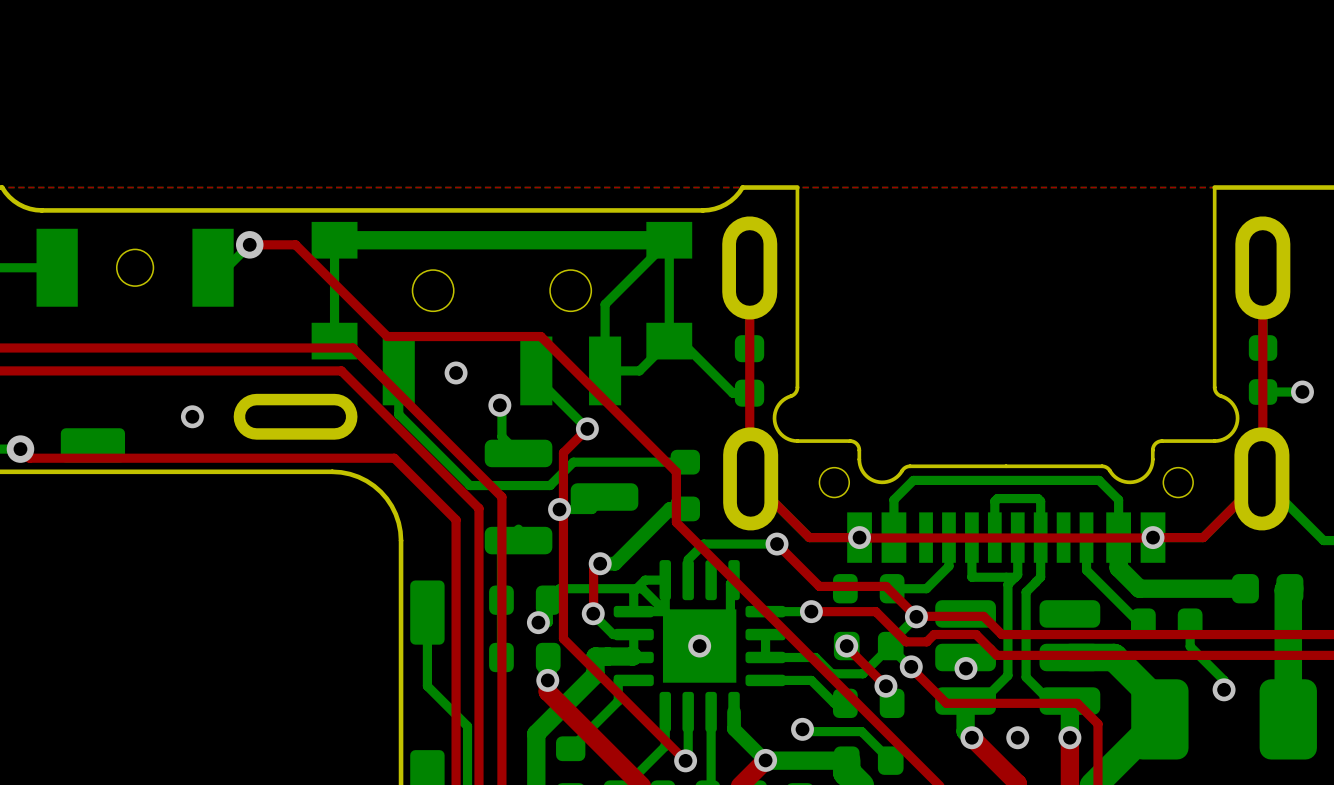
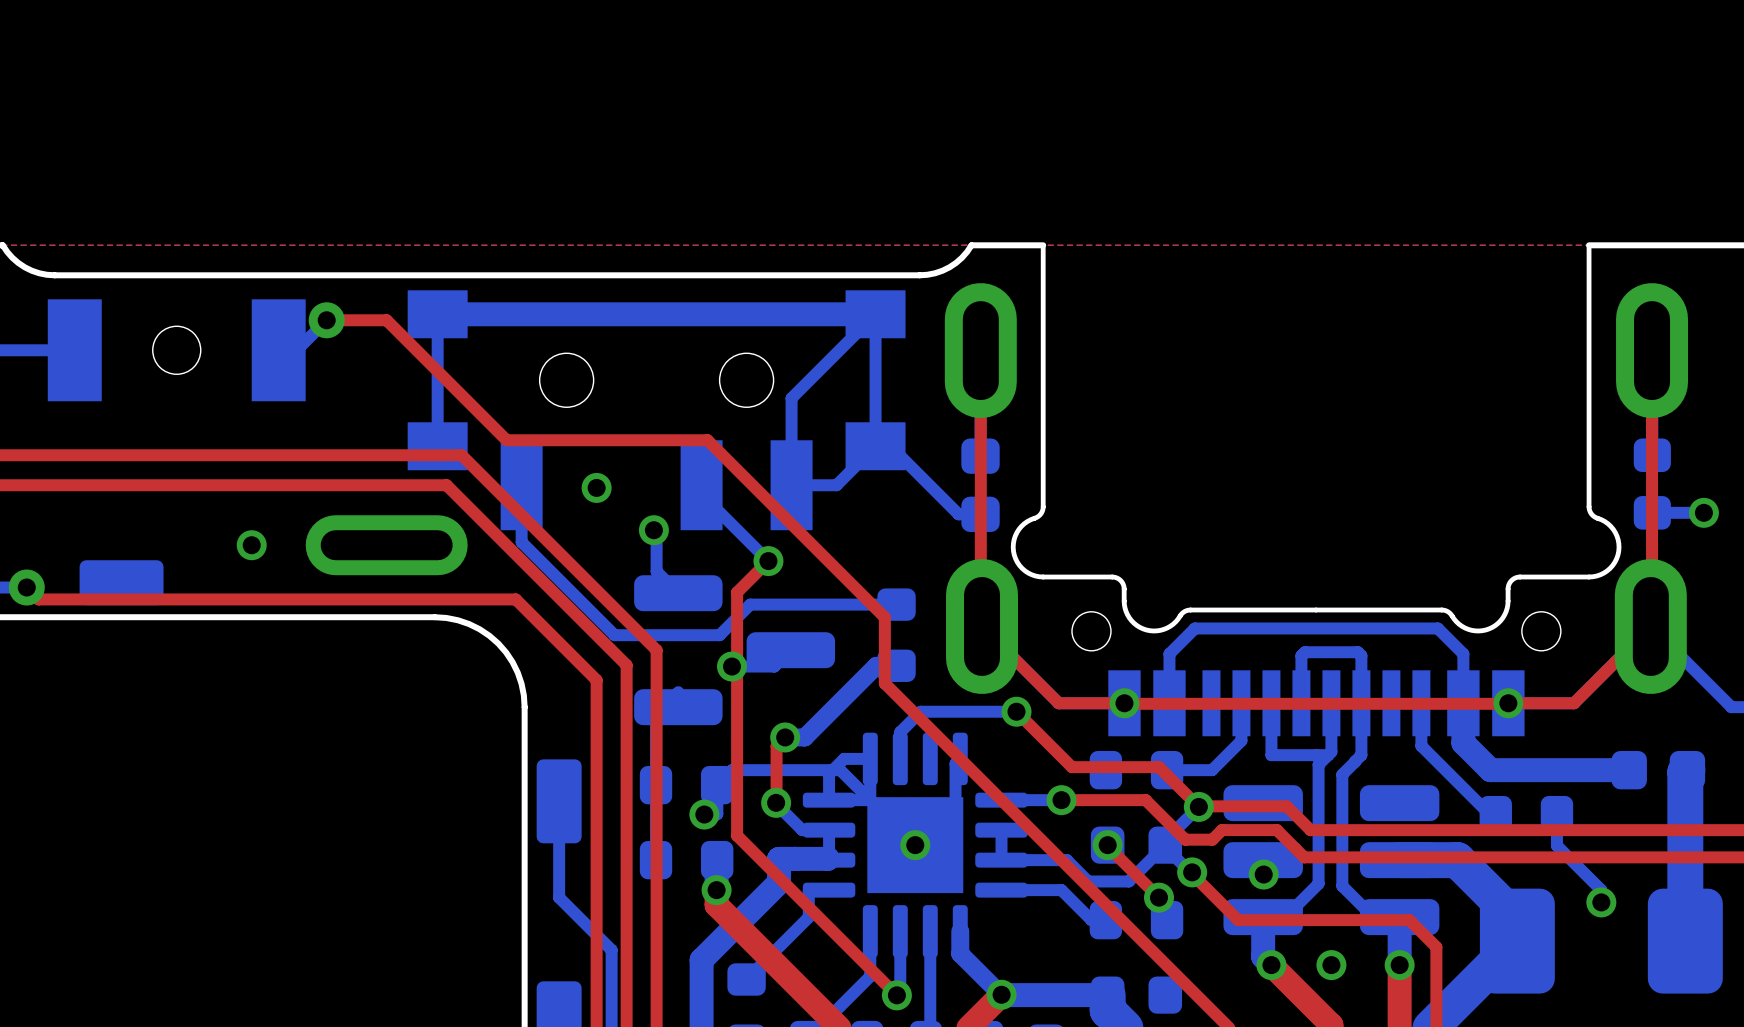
bottom track: (802, 729) (804, 731) (861, 731) (890, 760) -> none
via: (802, 729) -> none

